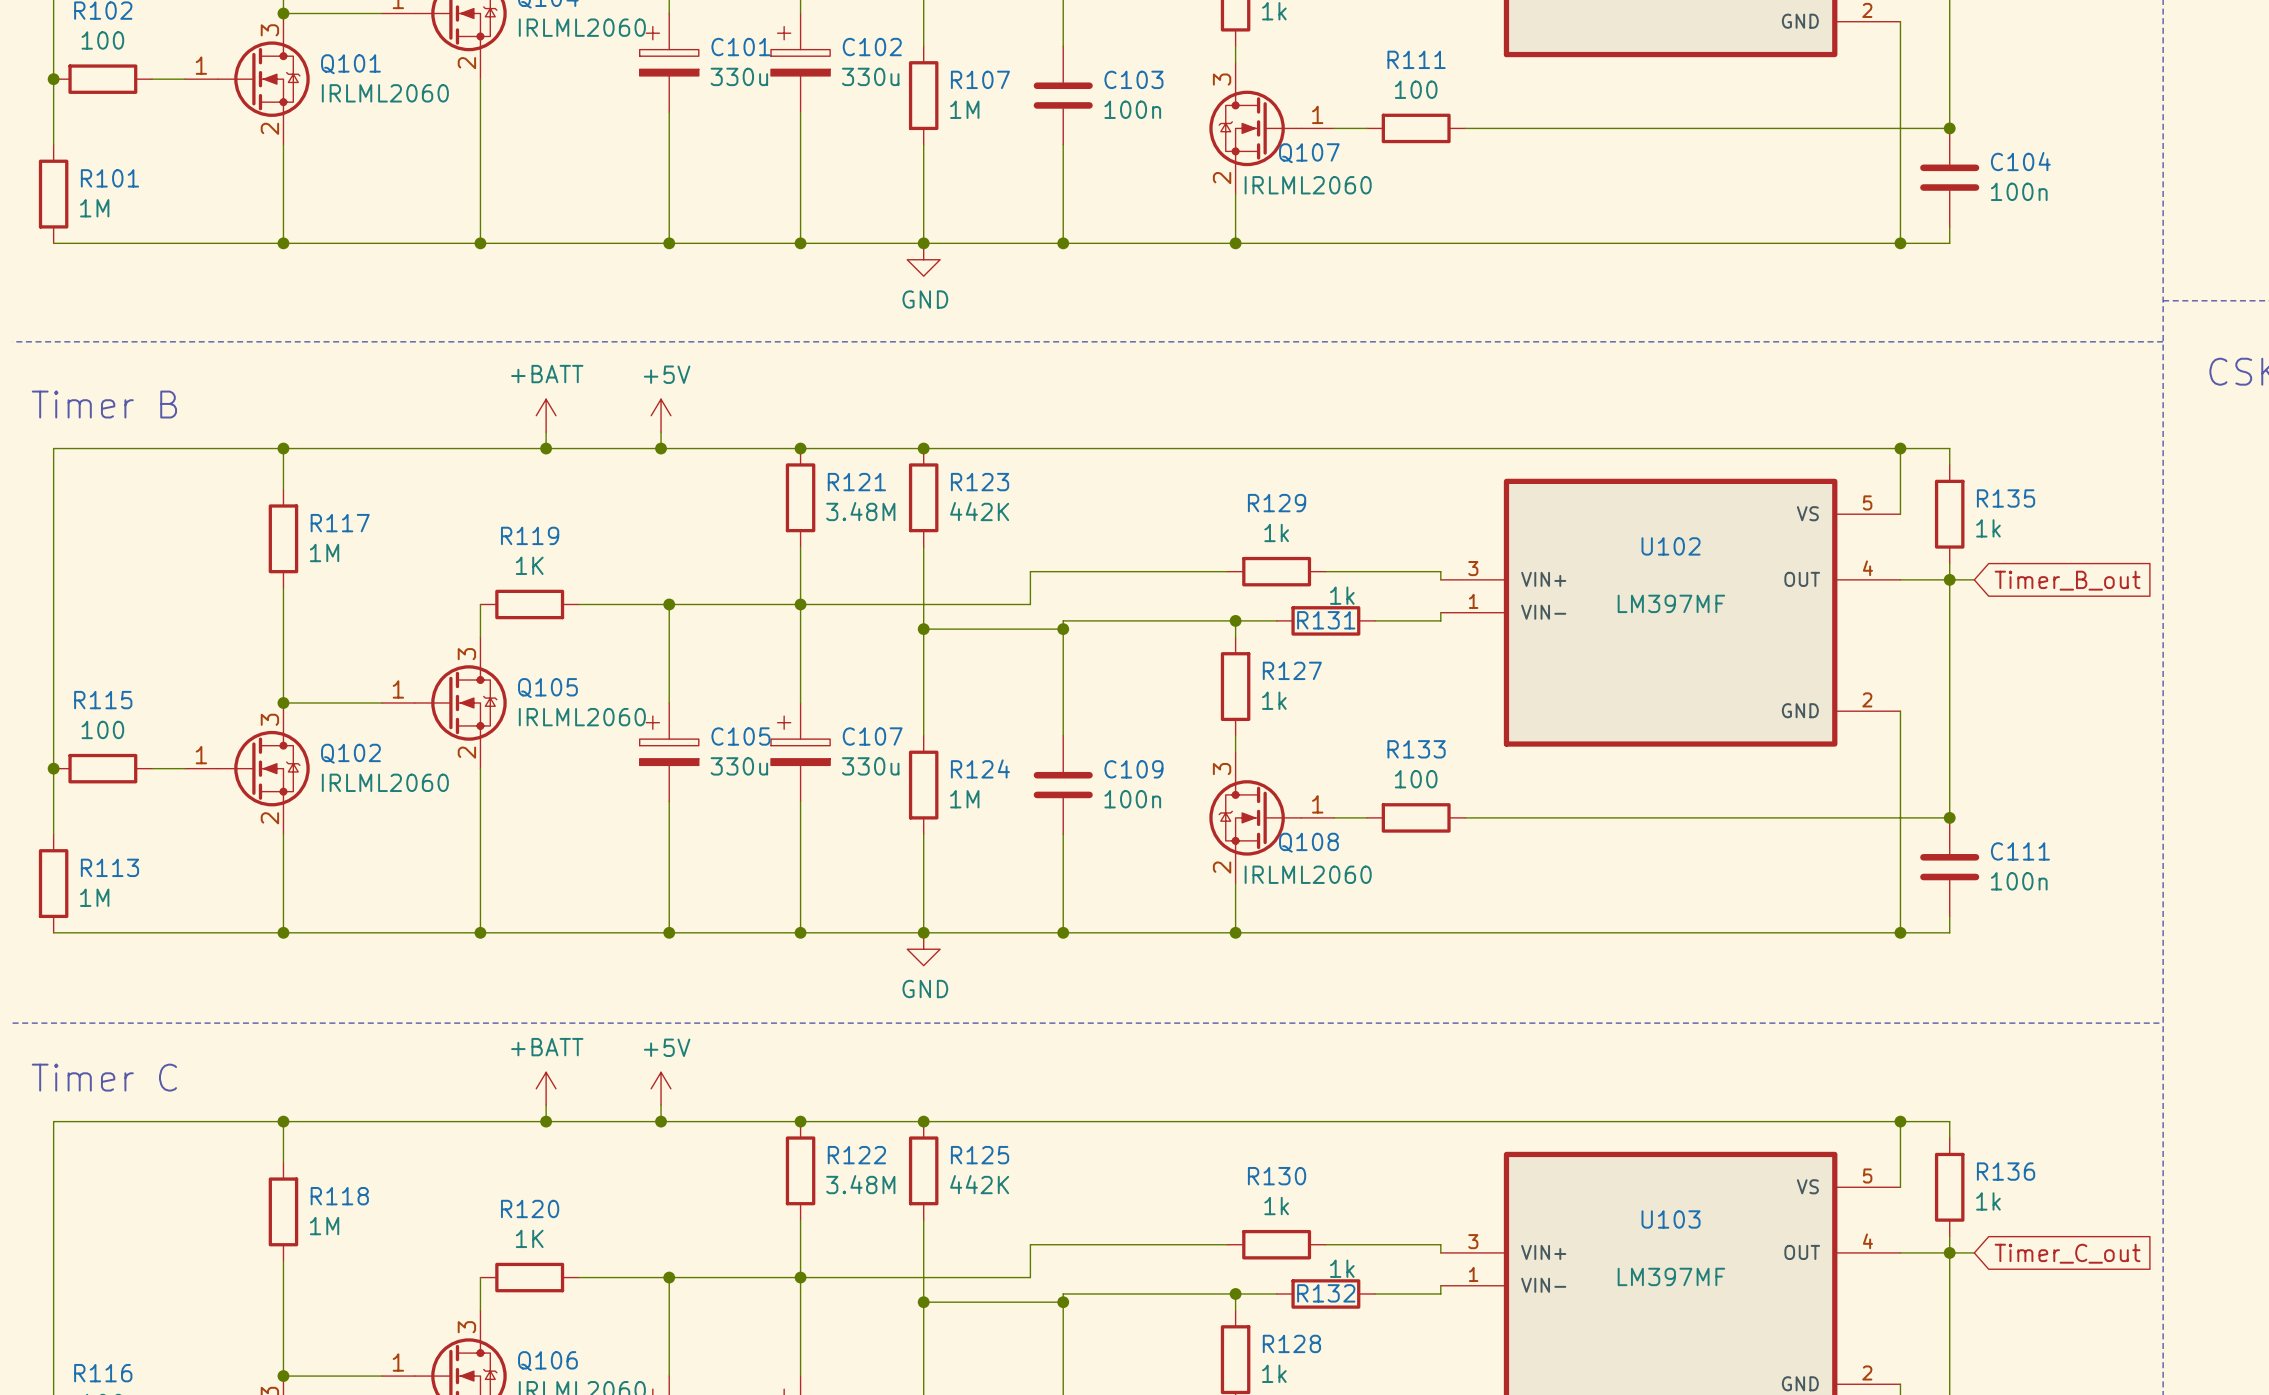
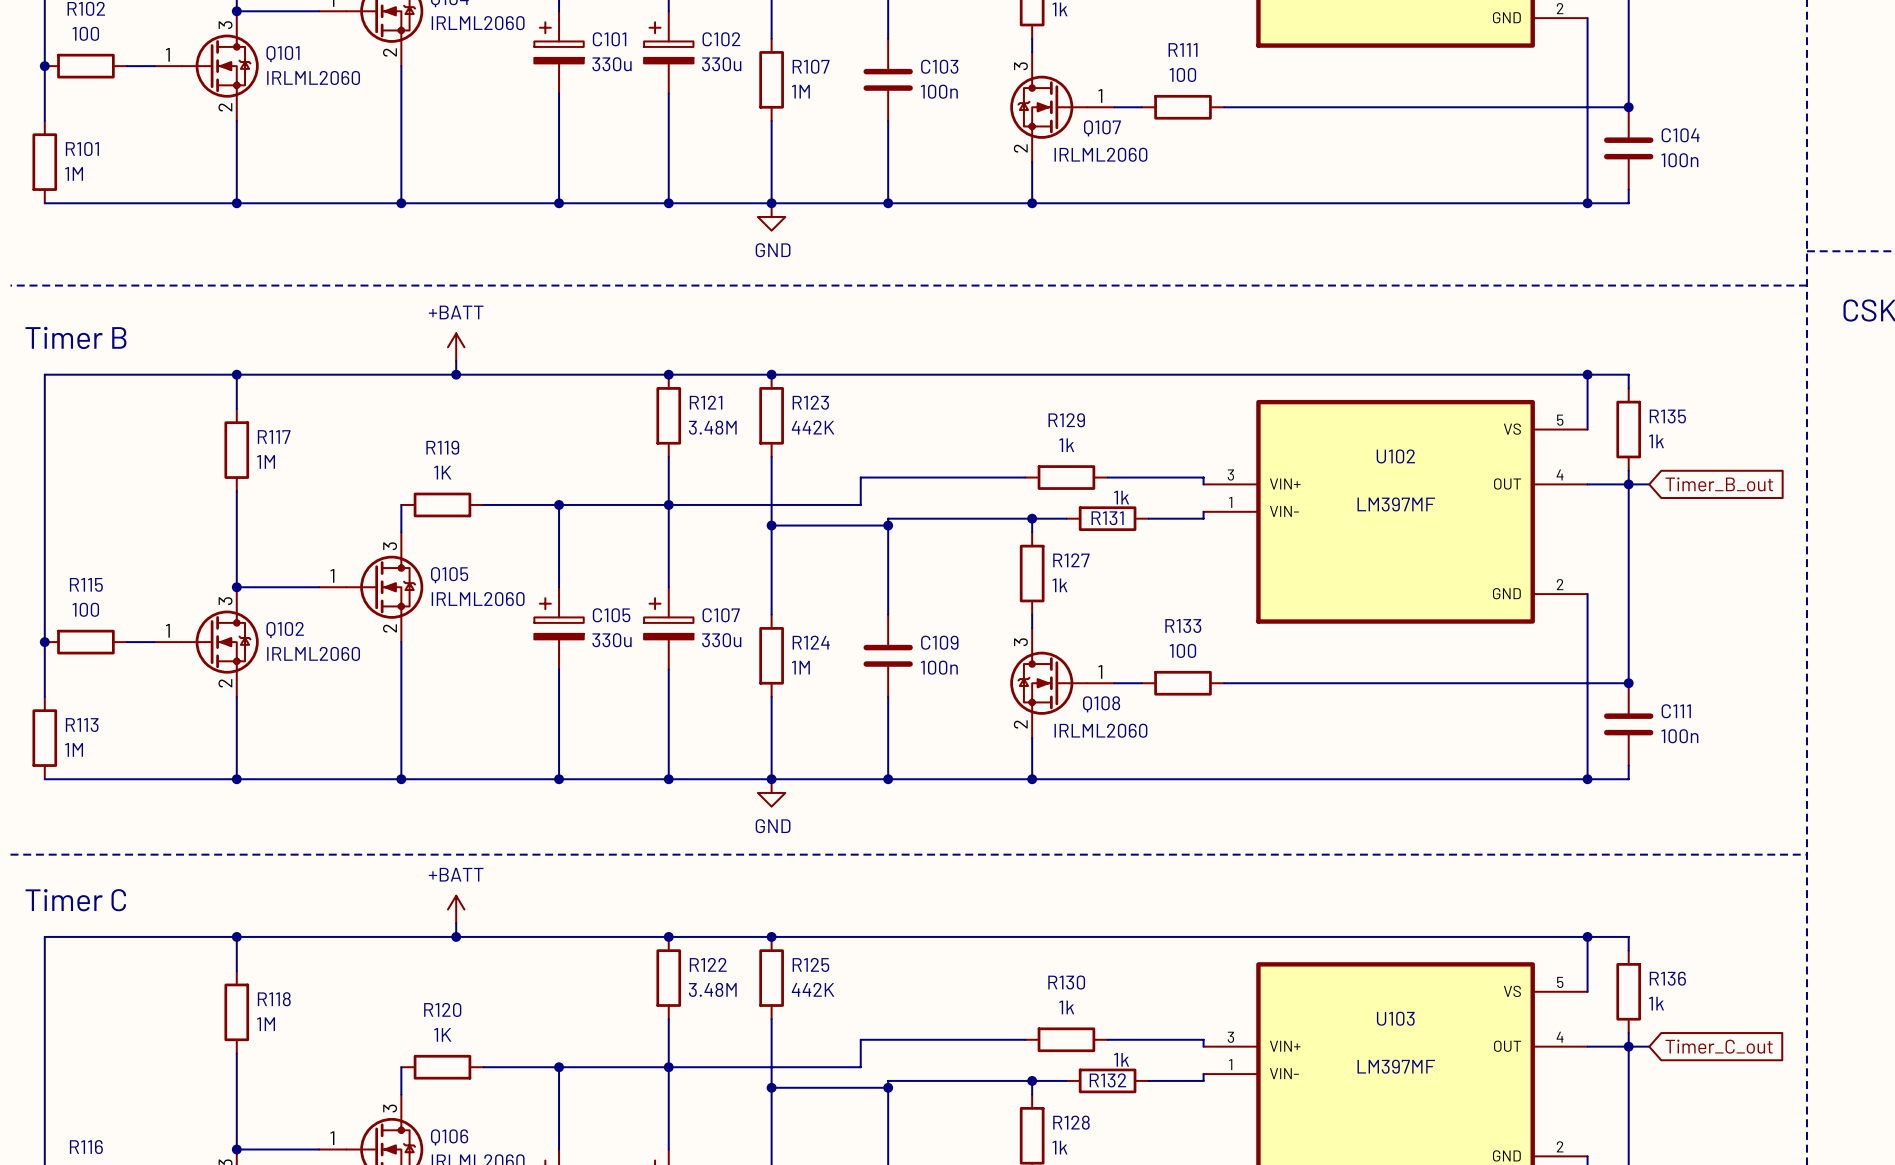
power symbol: +5V (661, 415) -> none
wire: (661, 432) (661, 448) -> none
junction: (661, 448) -> none
power symbol: +5V (661, 1088) -> none
wire: (661, 1105) (661, 1121) -> none
junction: (661, 1121) -> none

